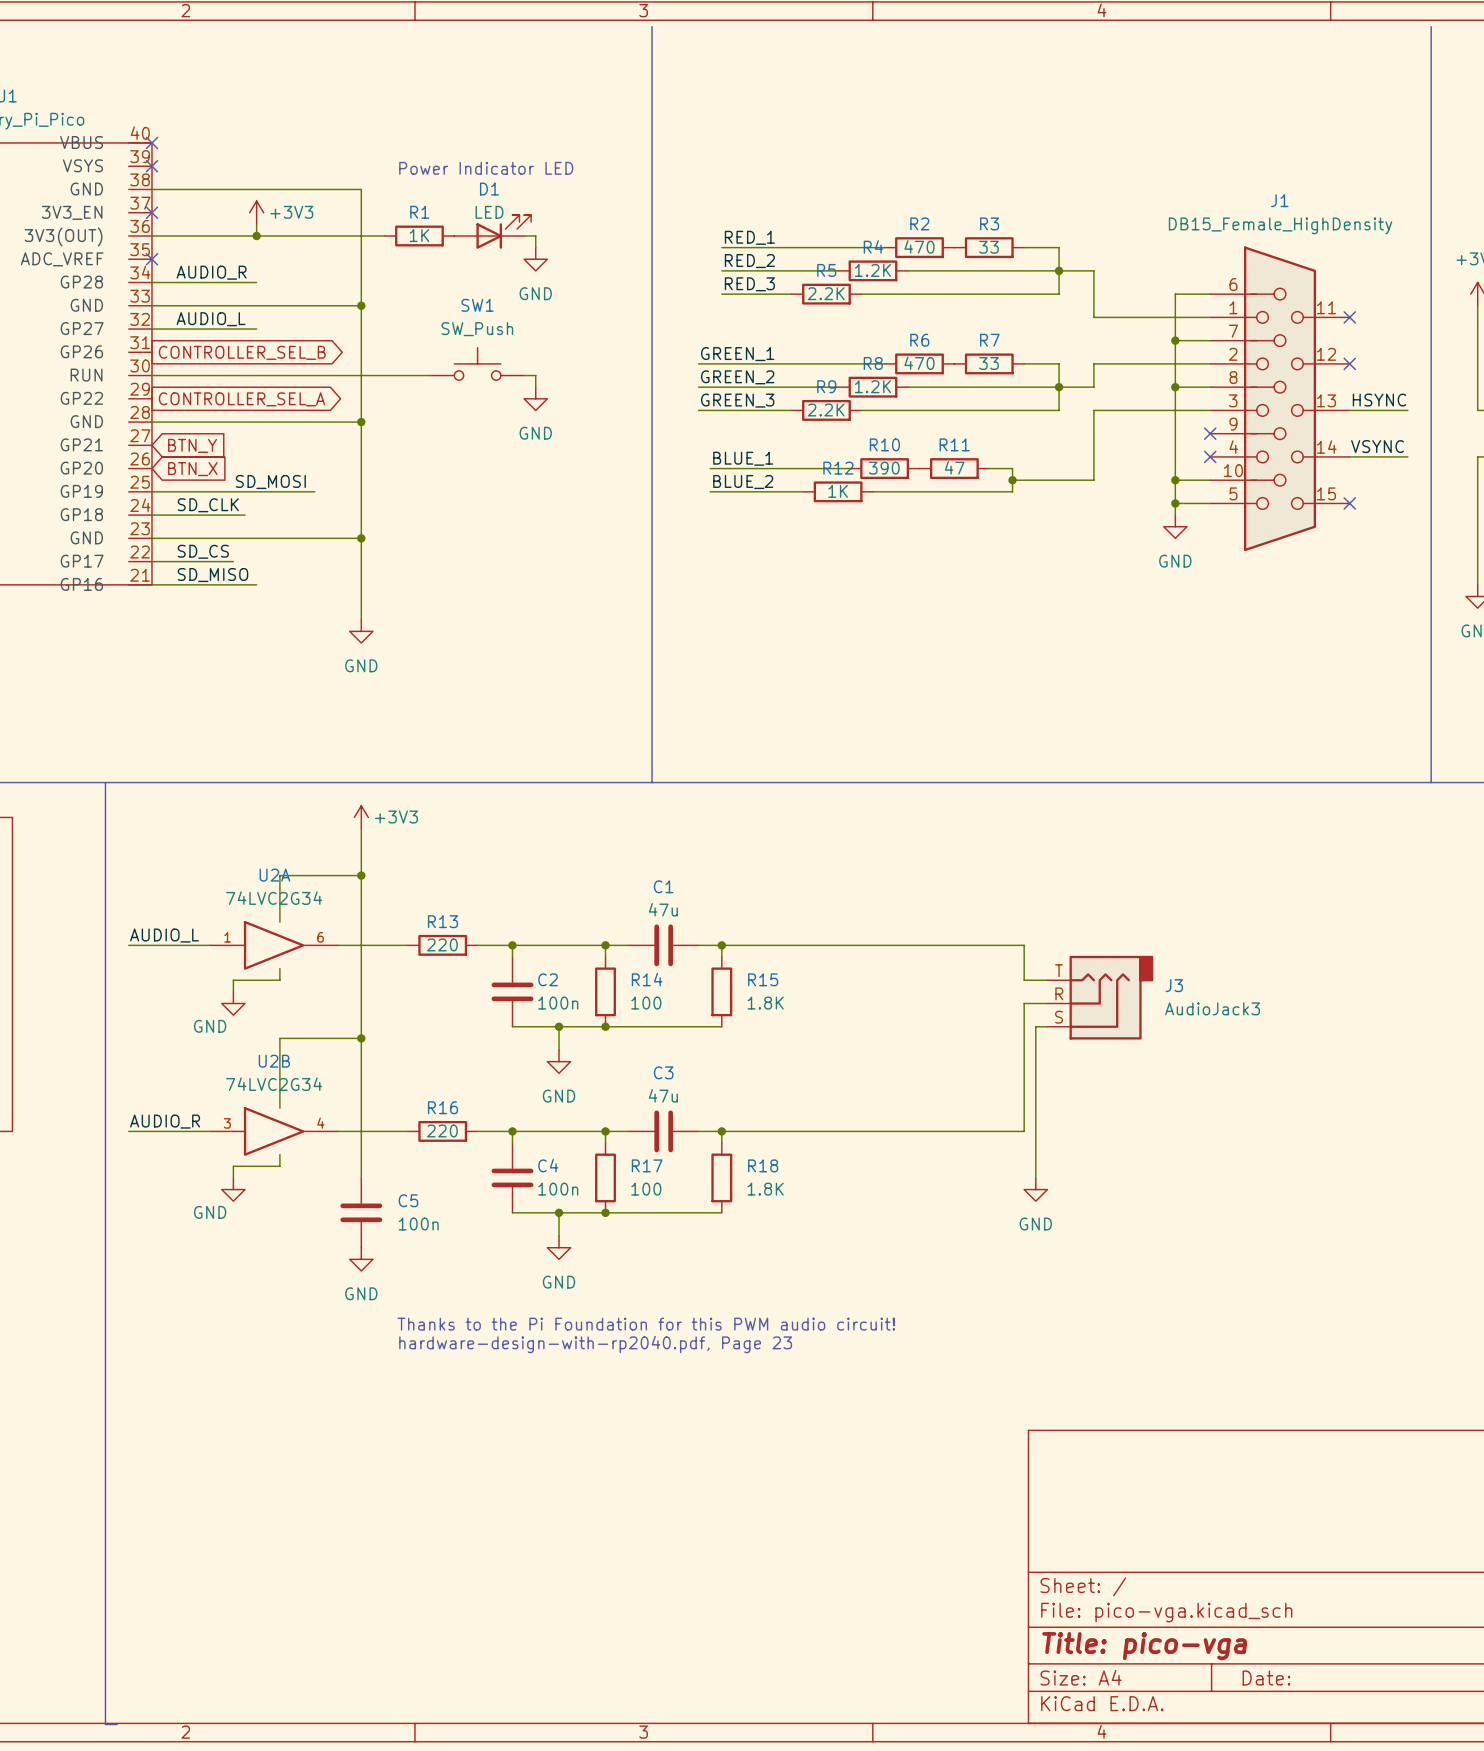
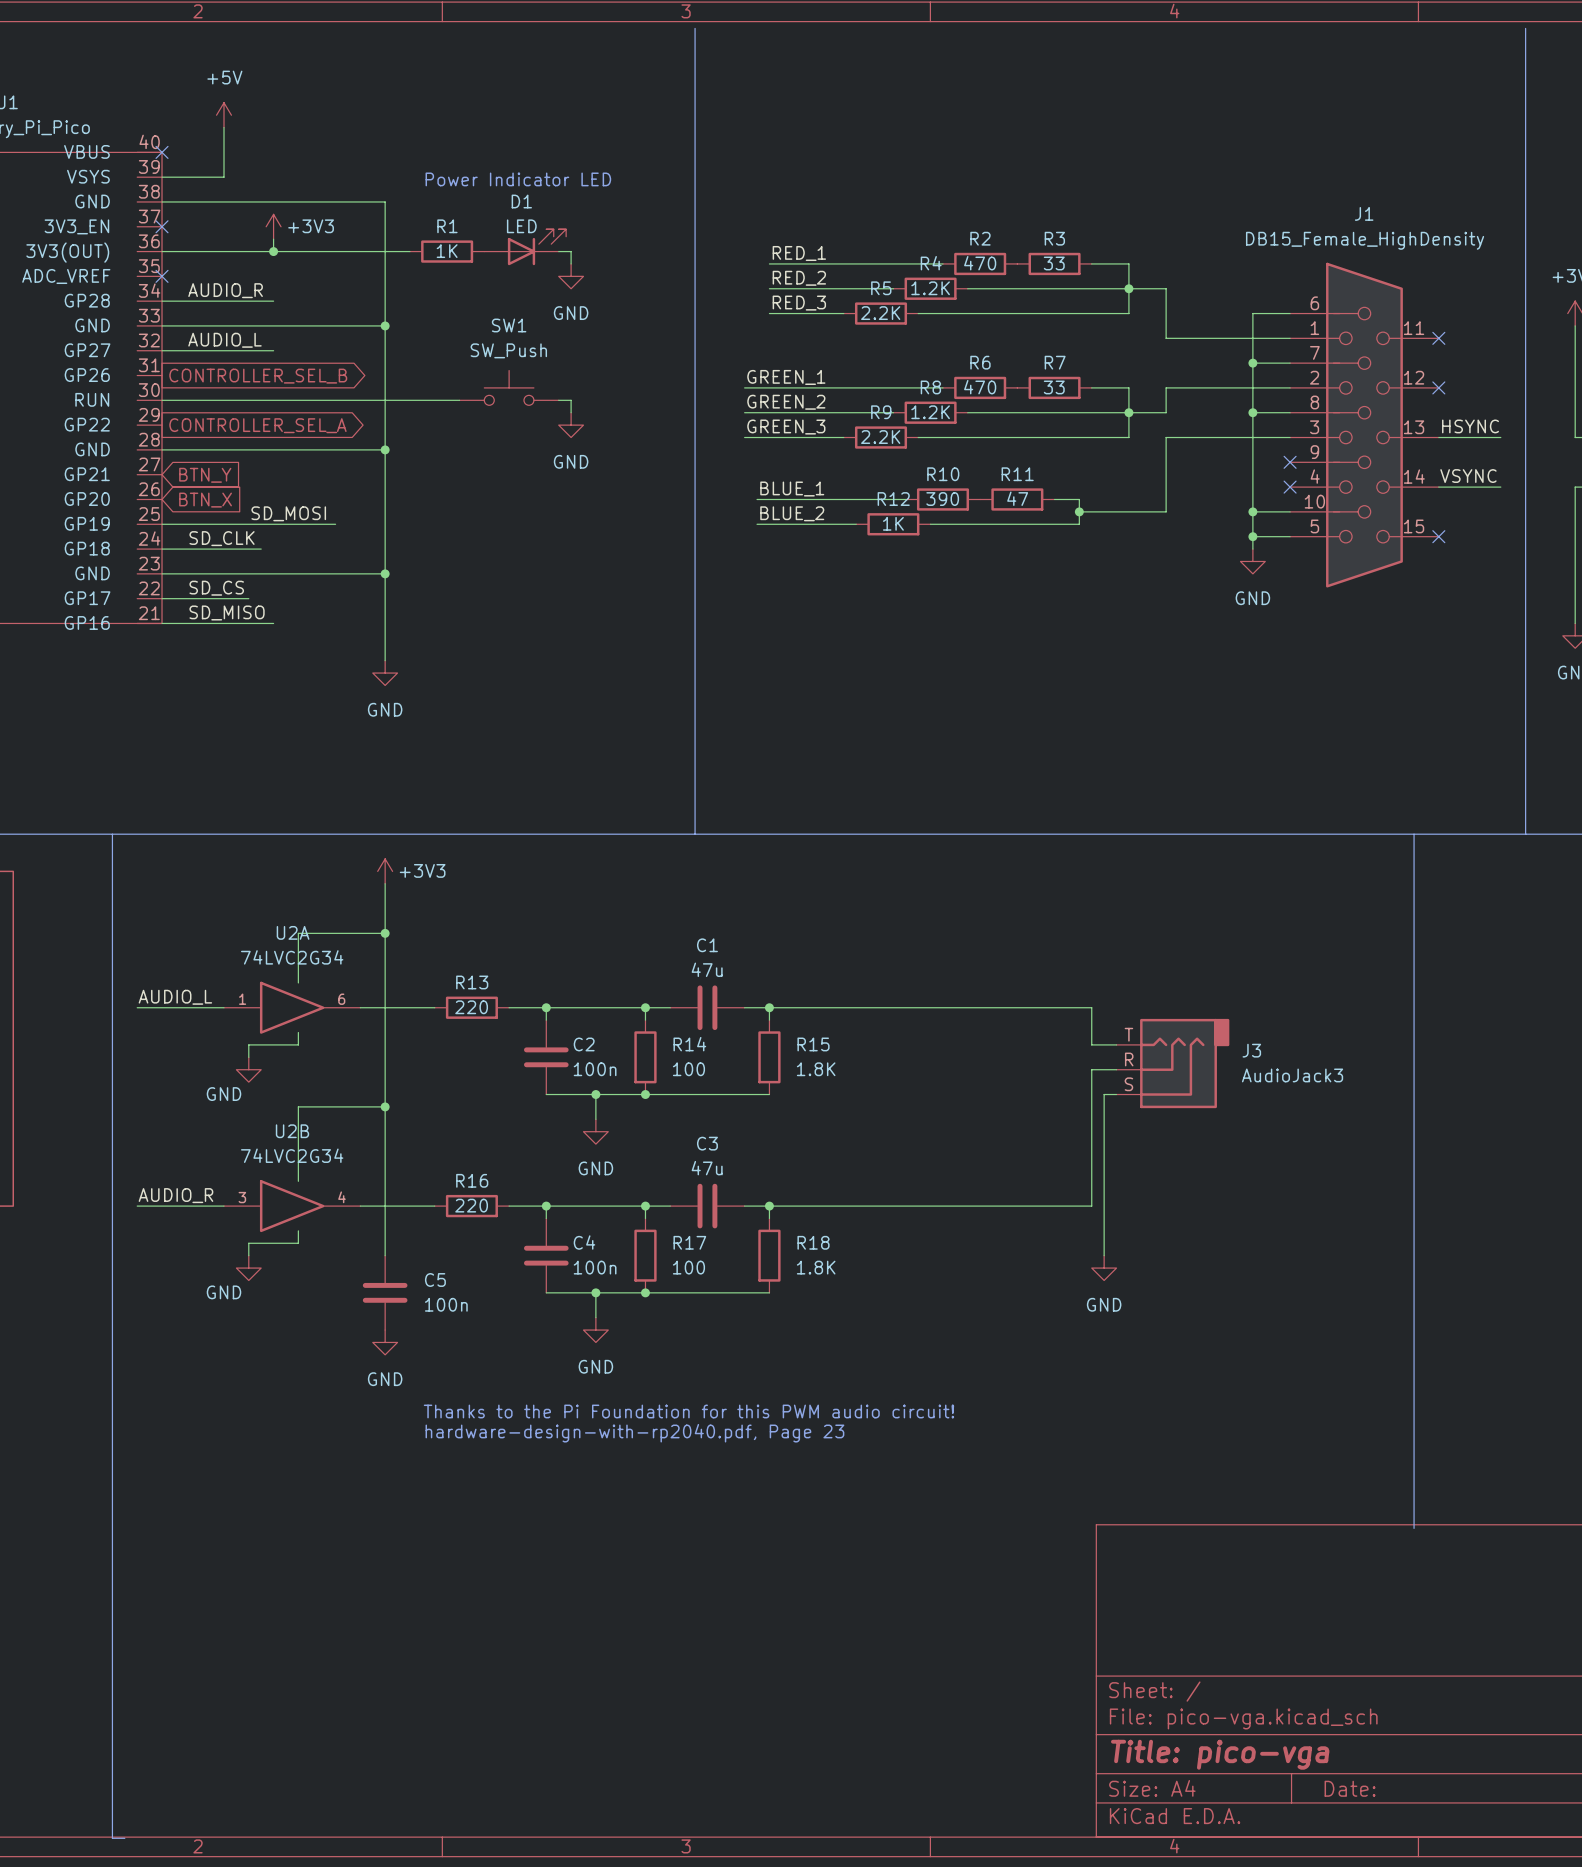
power symbol: none -> +5V (223, 115)
wire: none -> (223, 127) (223, 177) (162, 177)
no-connect mark: (151, 166) -> none
line: none -> (1414, 834) (1414, 1528)

